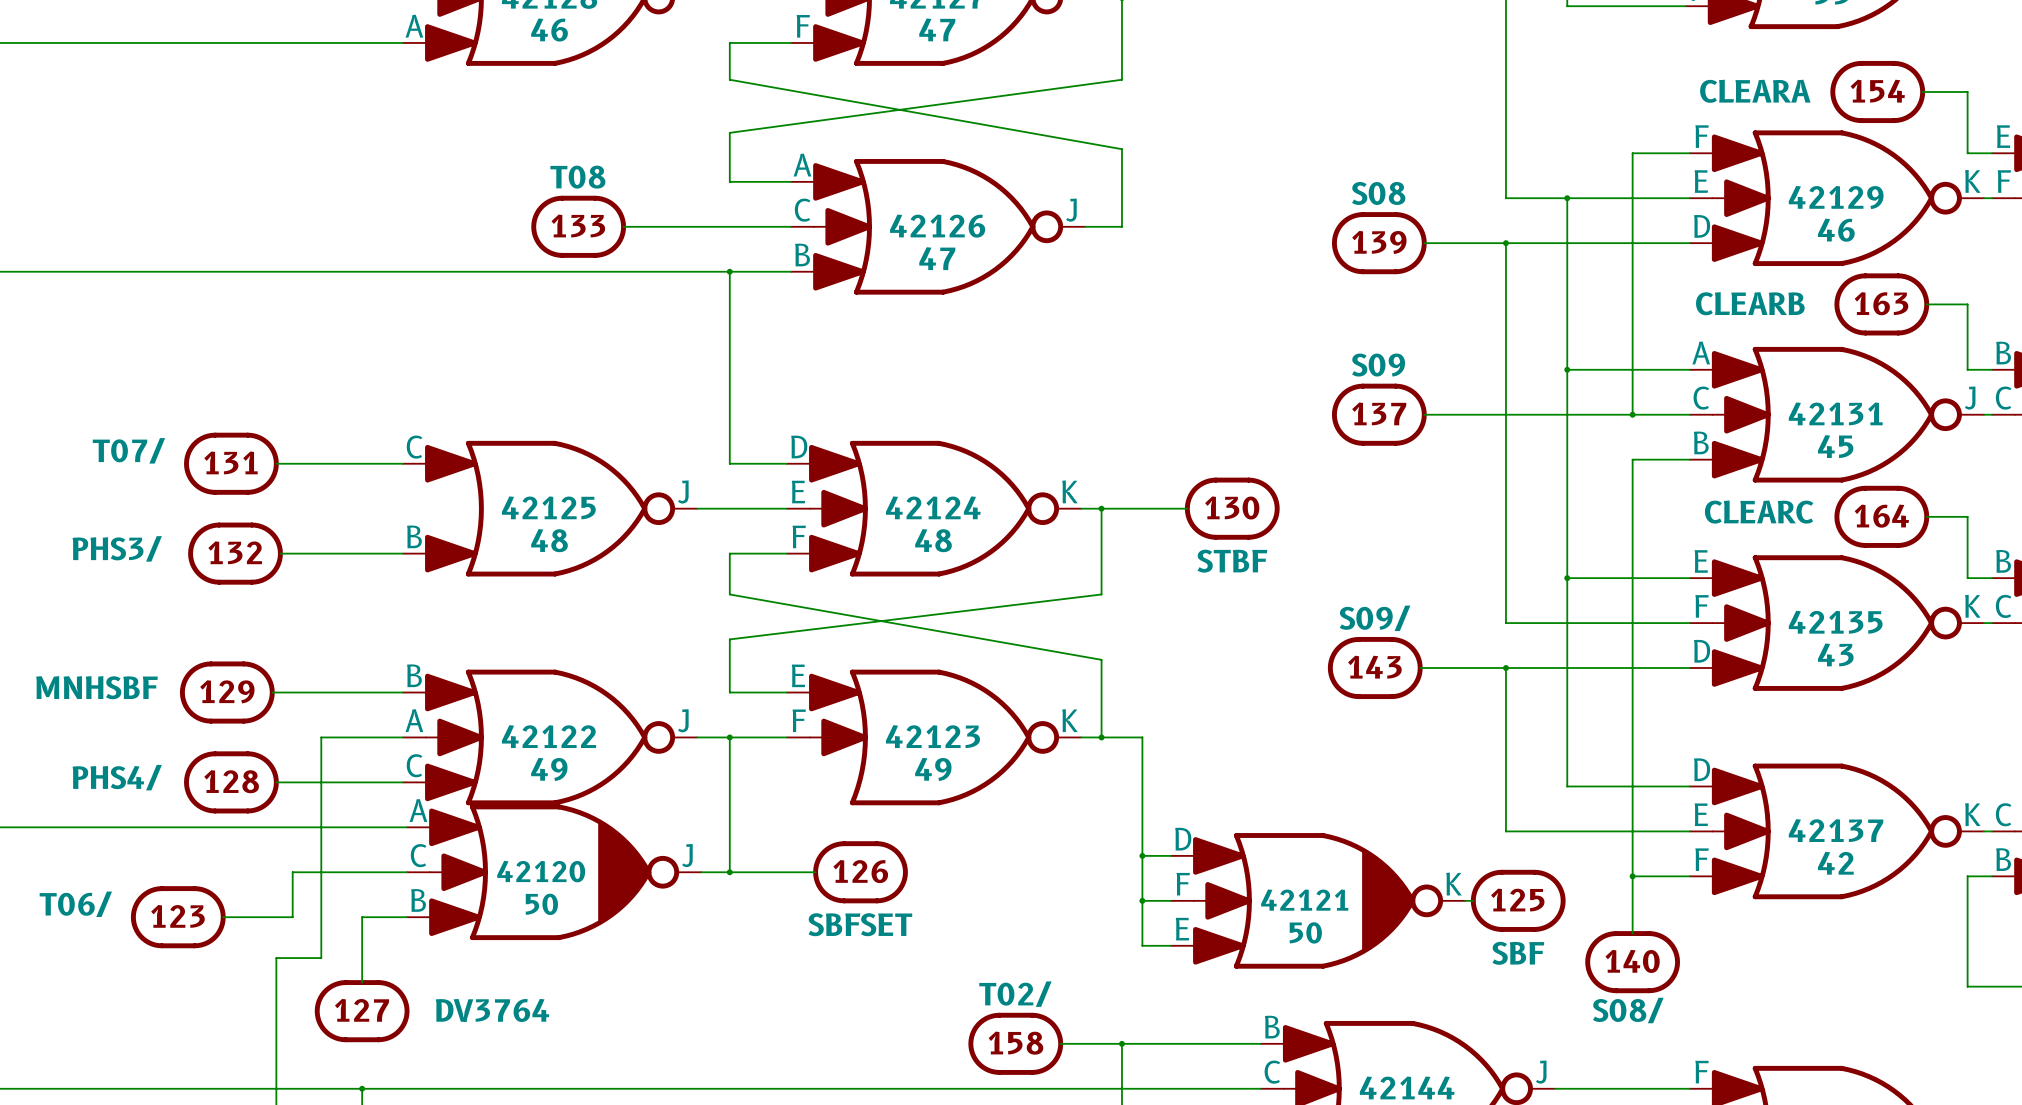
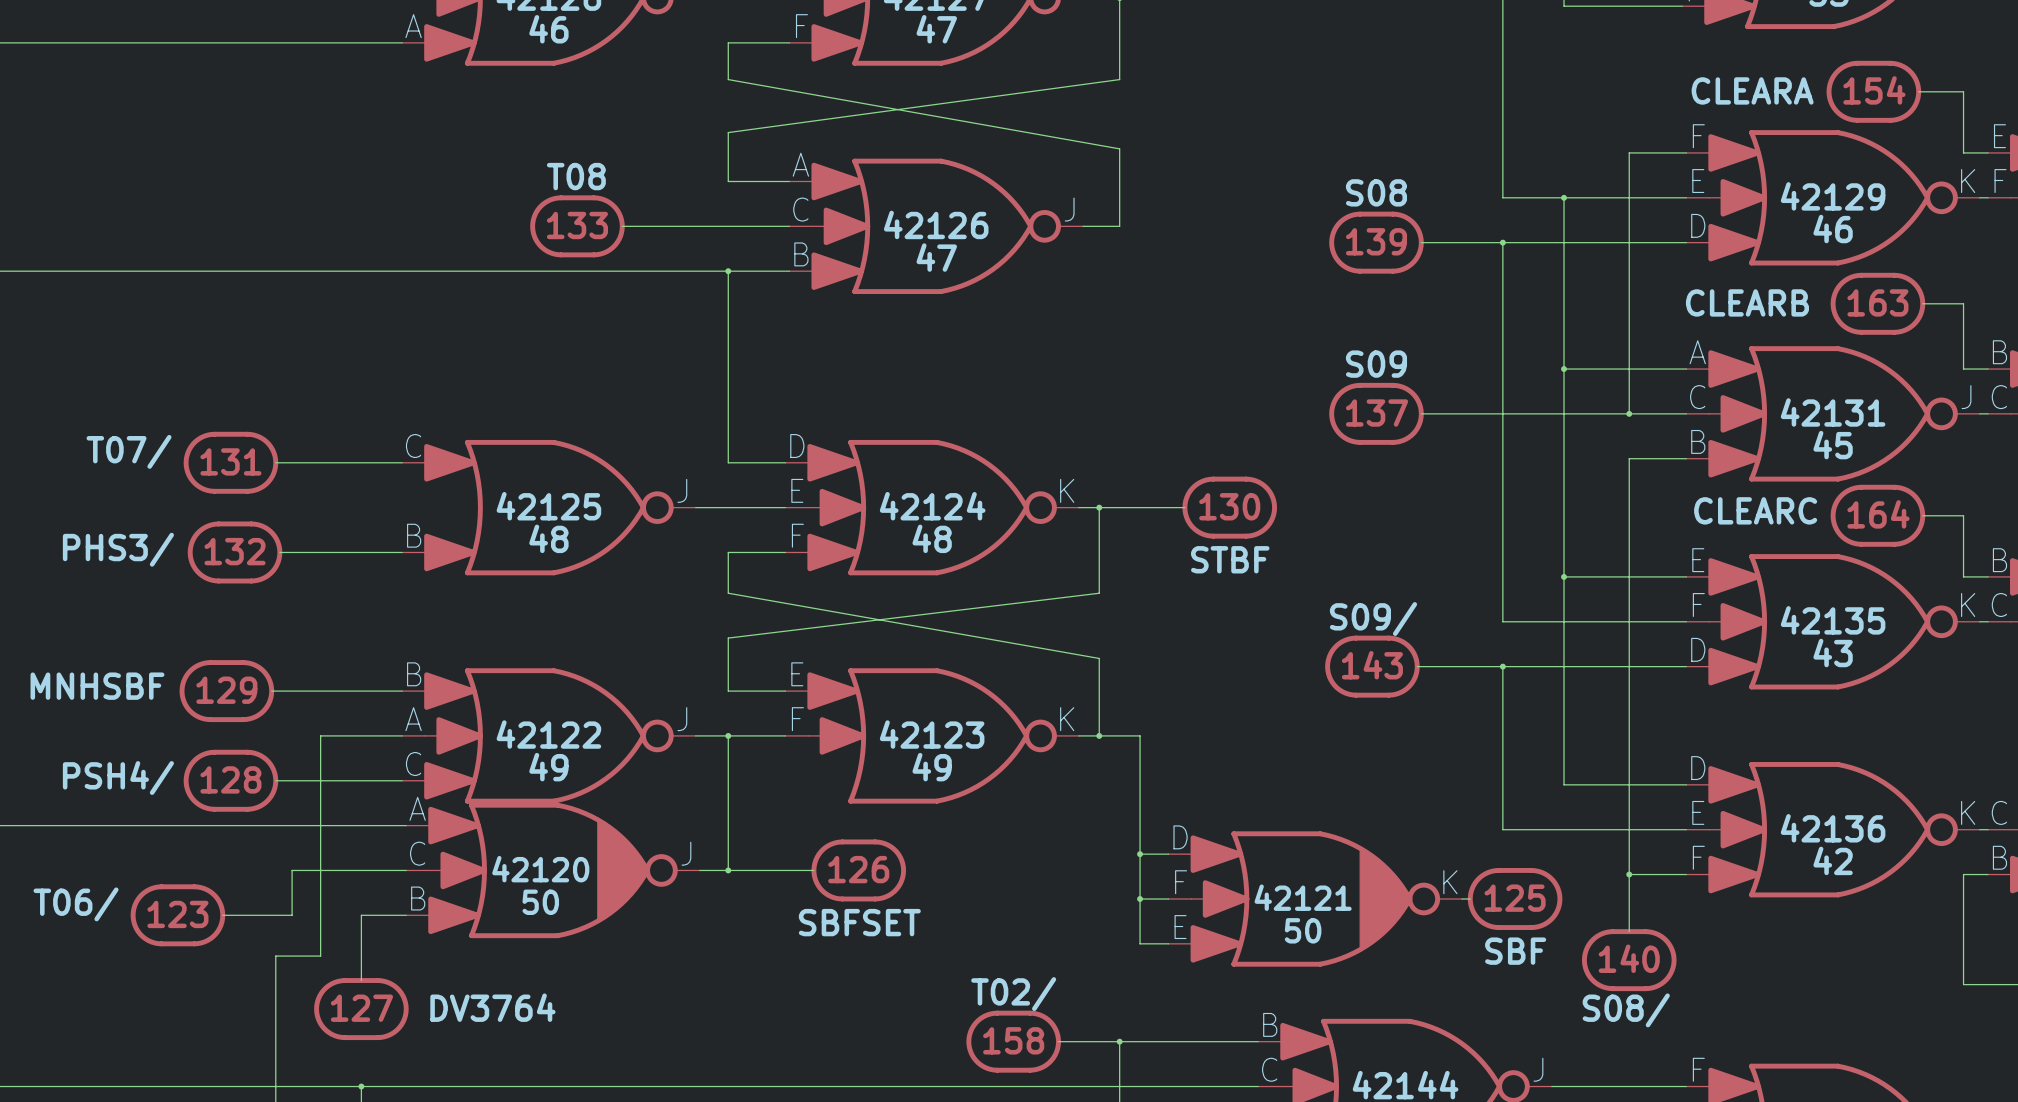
part text: PHS4/ (117, 777) -> PSH4/ (118, 778)
part text: 42137 (1836, 830) -> 42136 (1833, 828)

